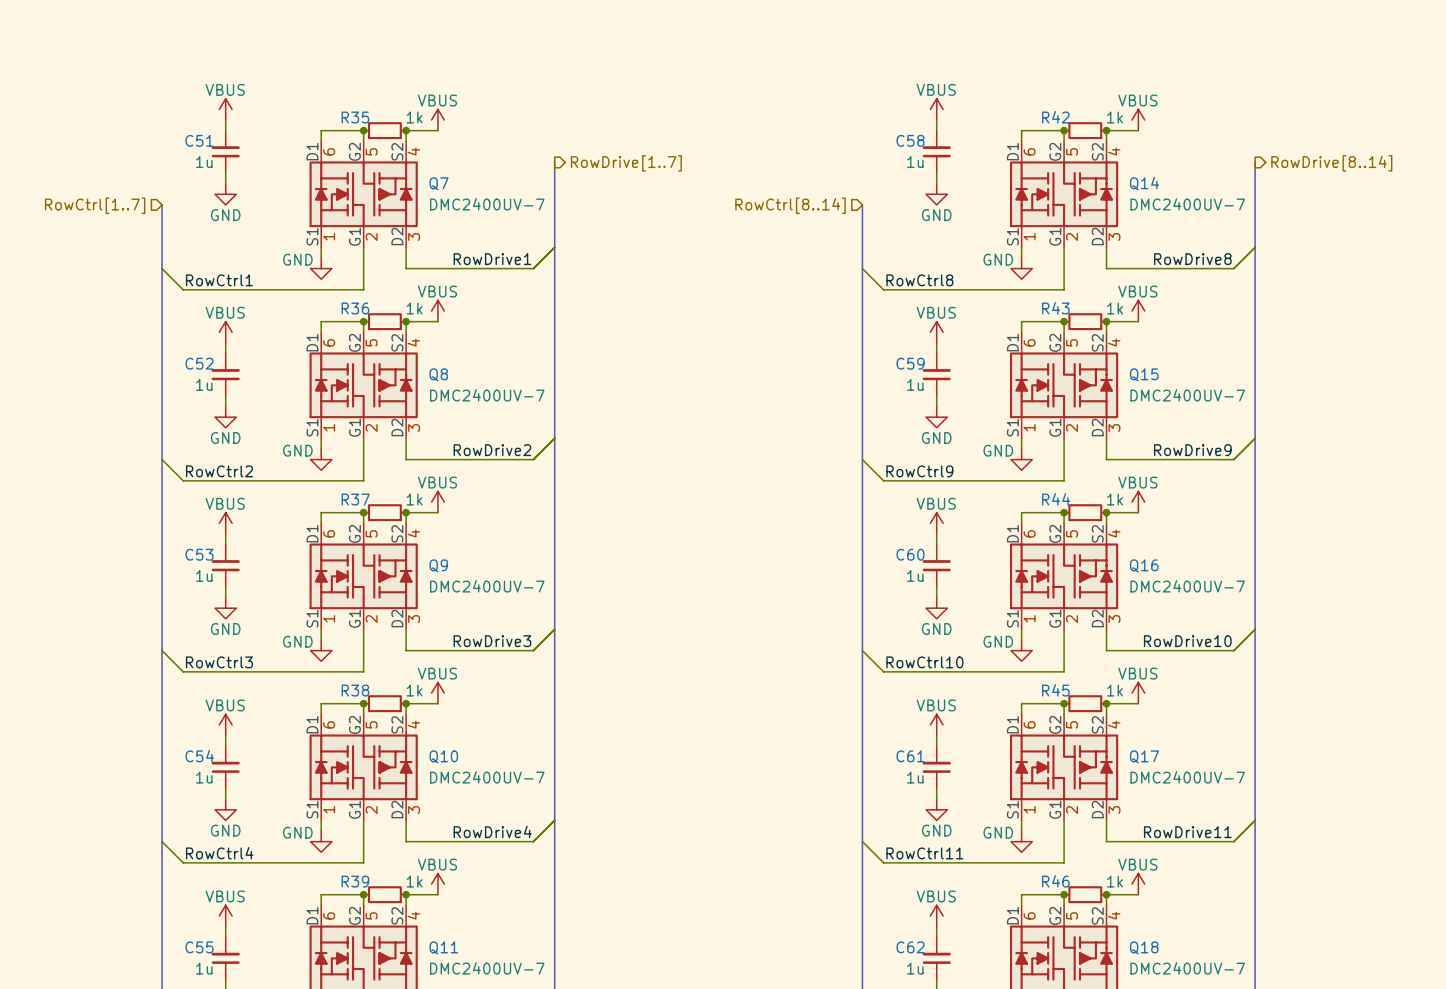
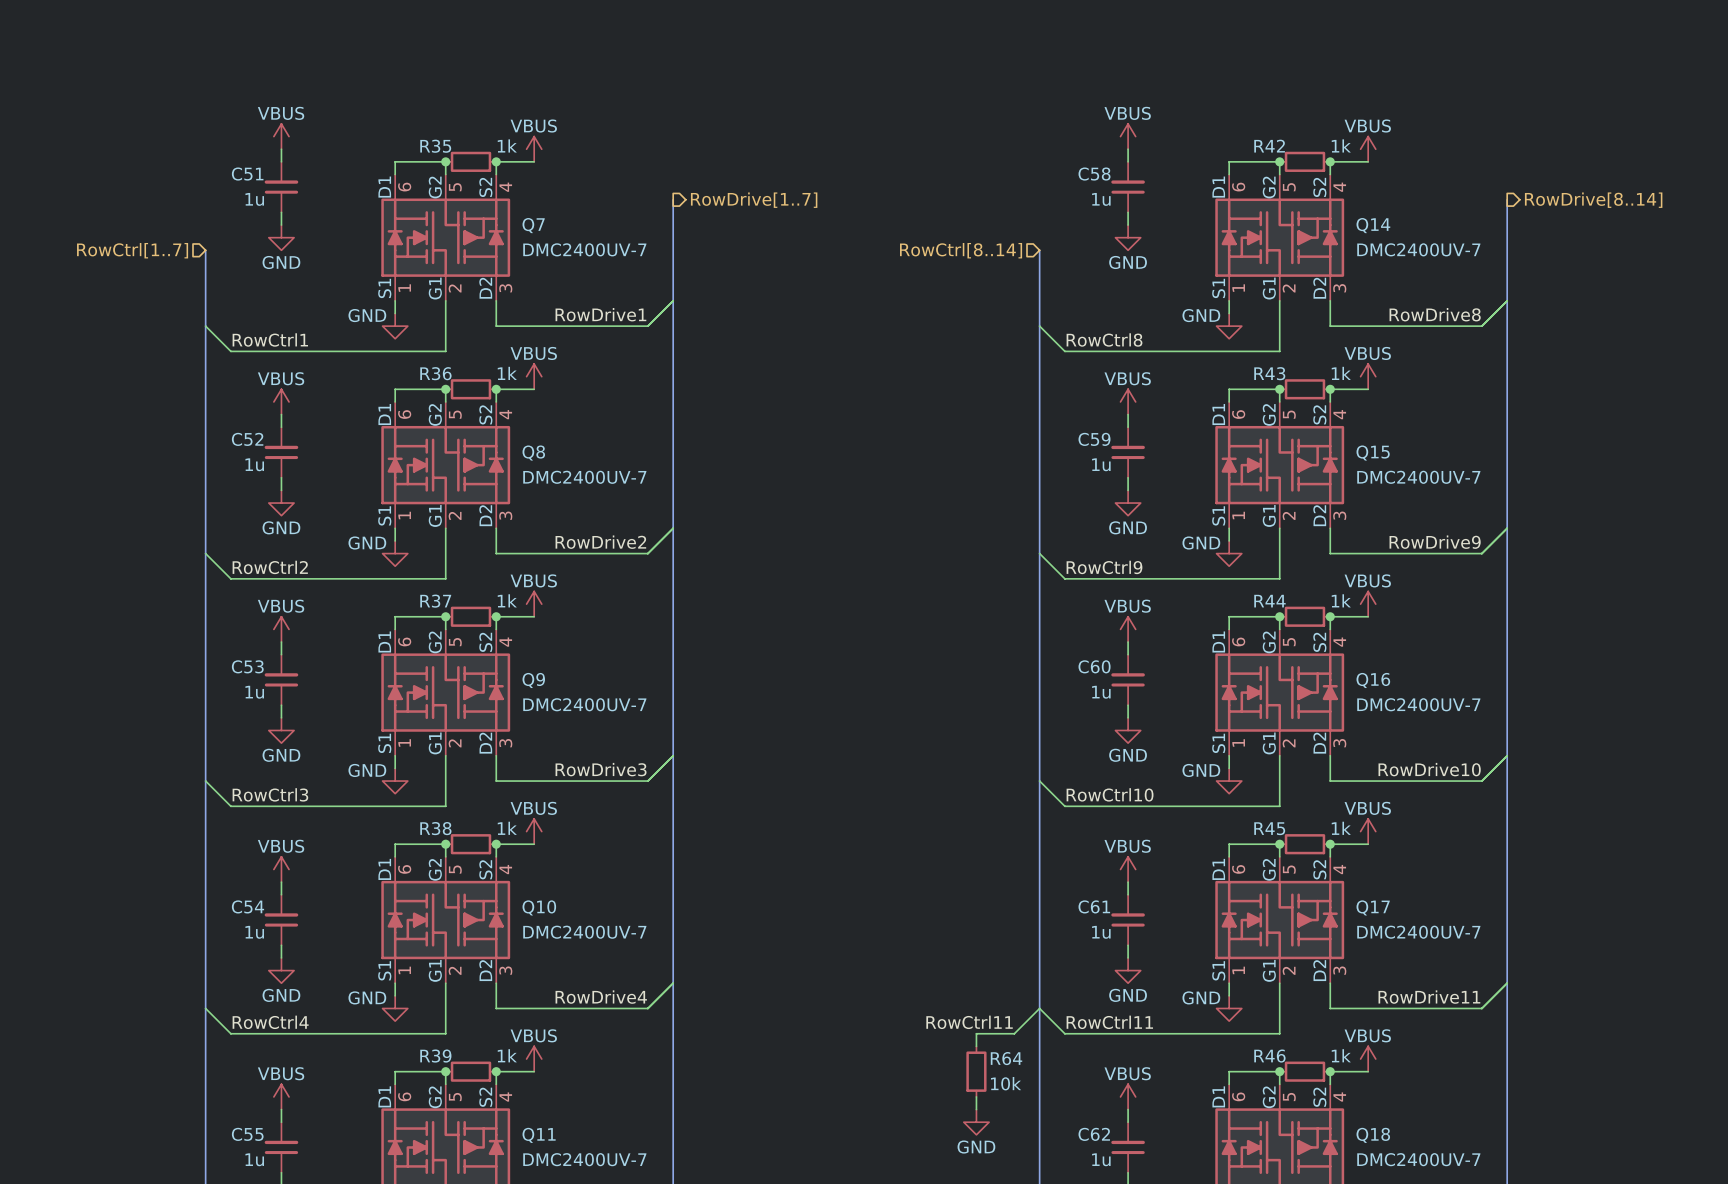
wire: none -> (1039, 1008) (1014, 1033) (976, 1033) (976, 1046)
label: none -> RowCtrl11 (969, 1022)
R64: none -> (976, 1071)
wire: none -> (976, 1096) (976, 1109)
power symbol: none -> GND (976, 1122)

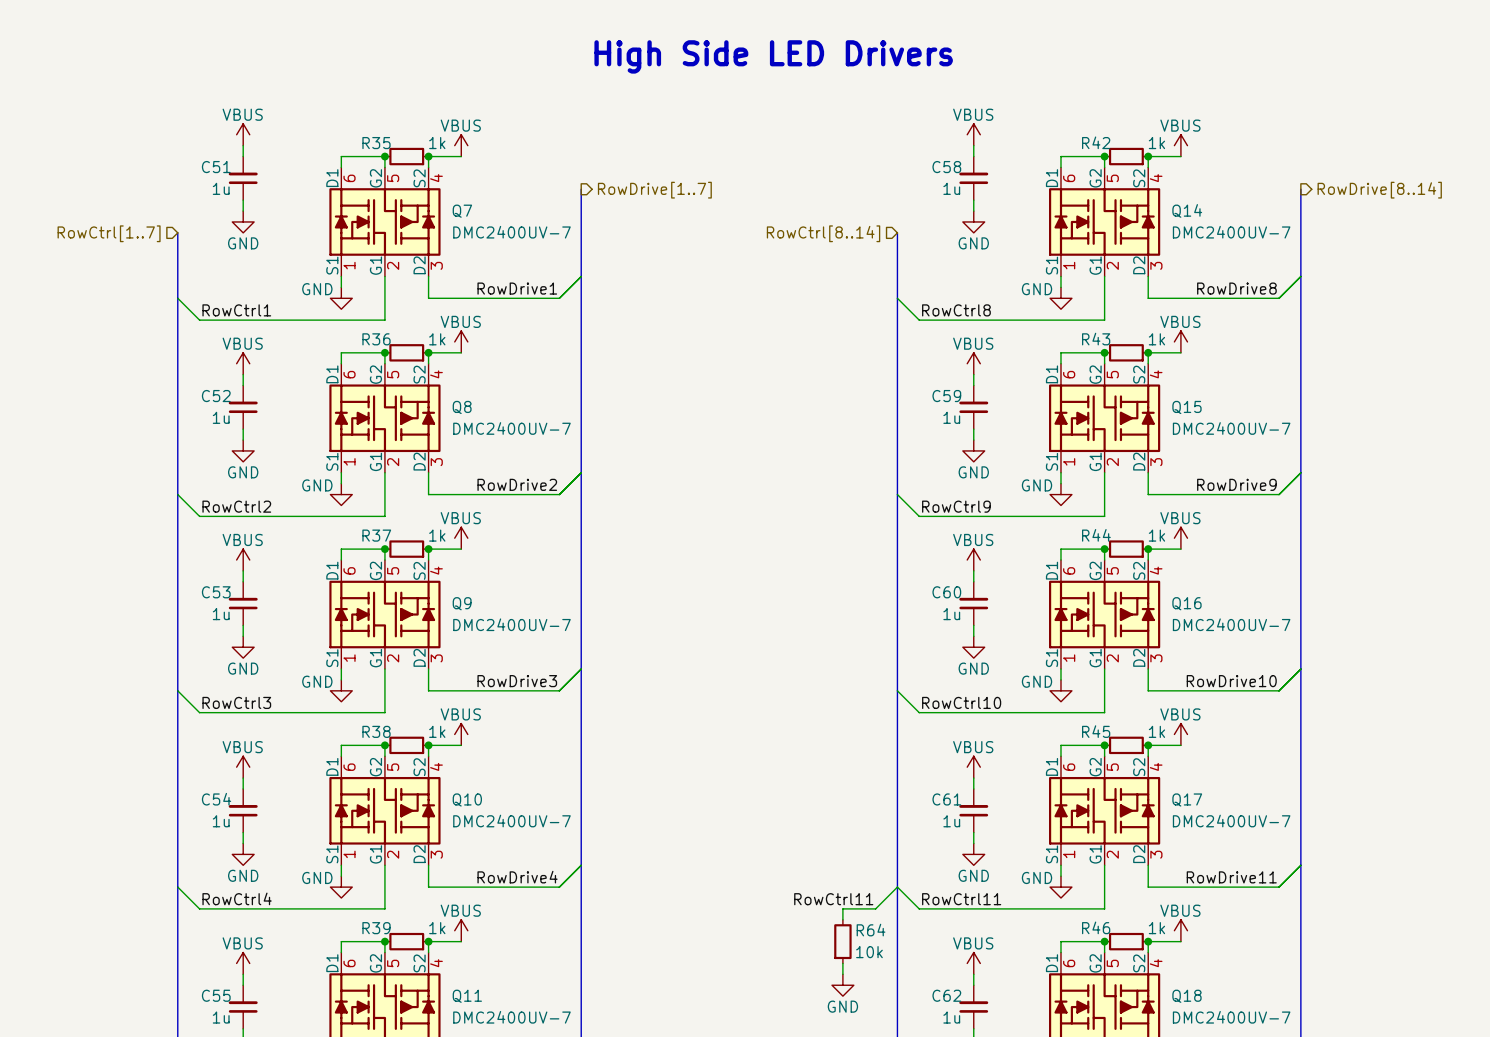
text: none -> High Side LED Drivers (773, 56)

